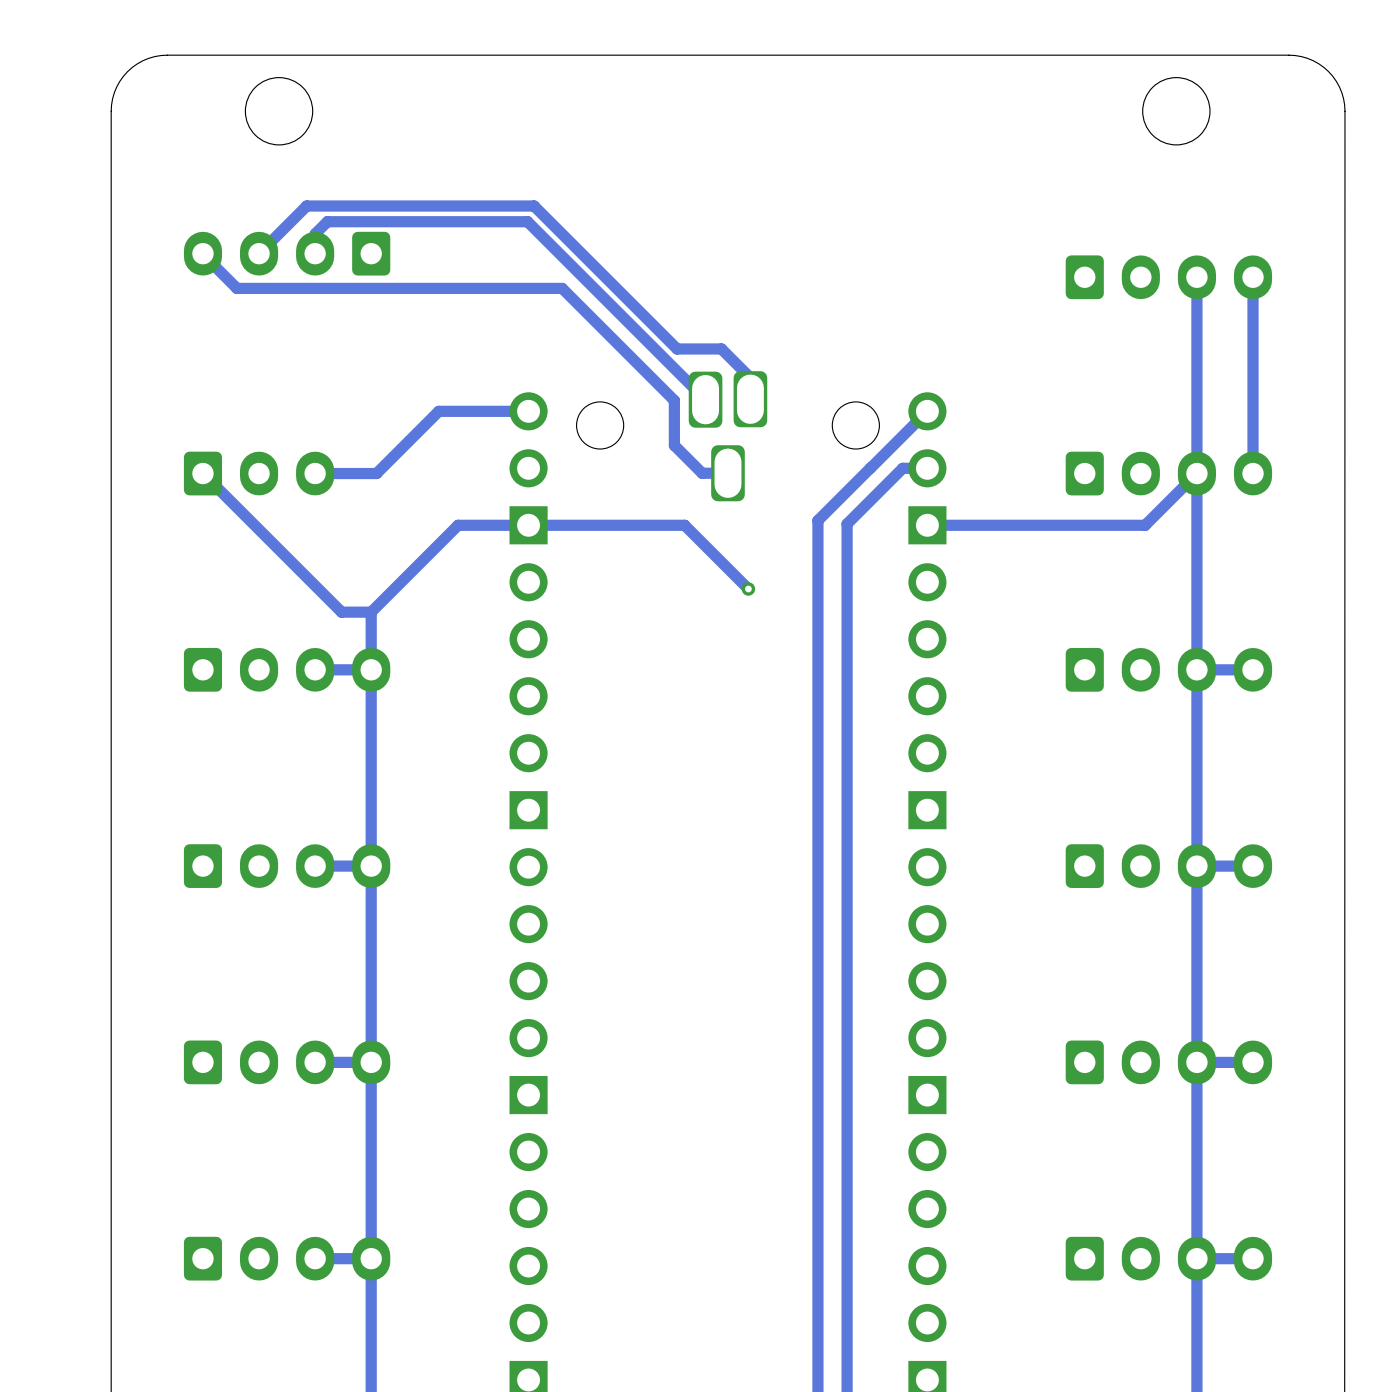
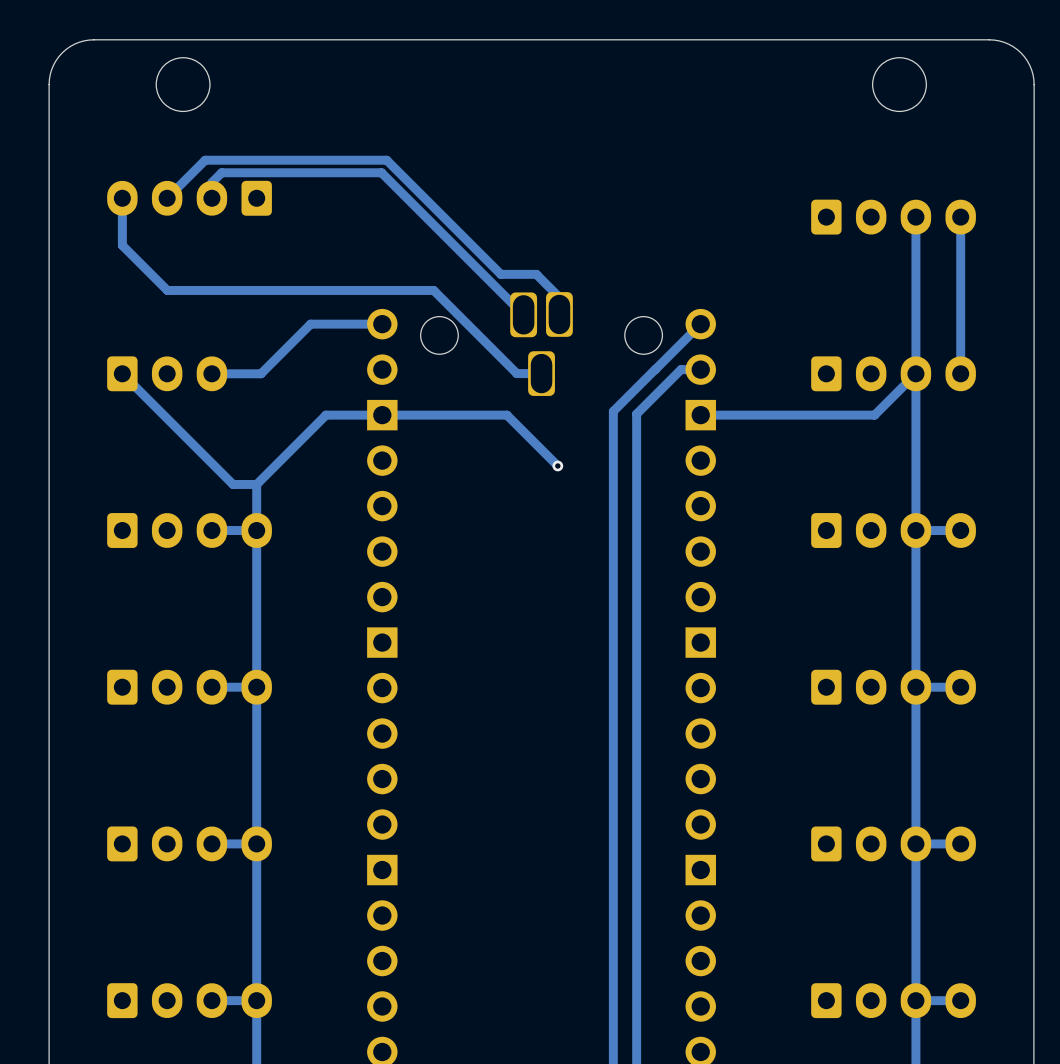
track: (202, 254) (236, 288) (562, 288) (674, 400) (674, 445) (702, 473) -> (122, 198) (122, 245) (167, 290) (433, 290) (516, 373) (520, 373)

